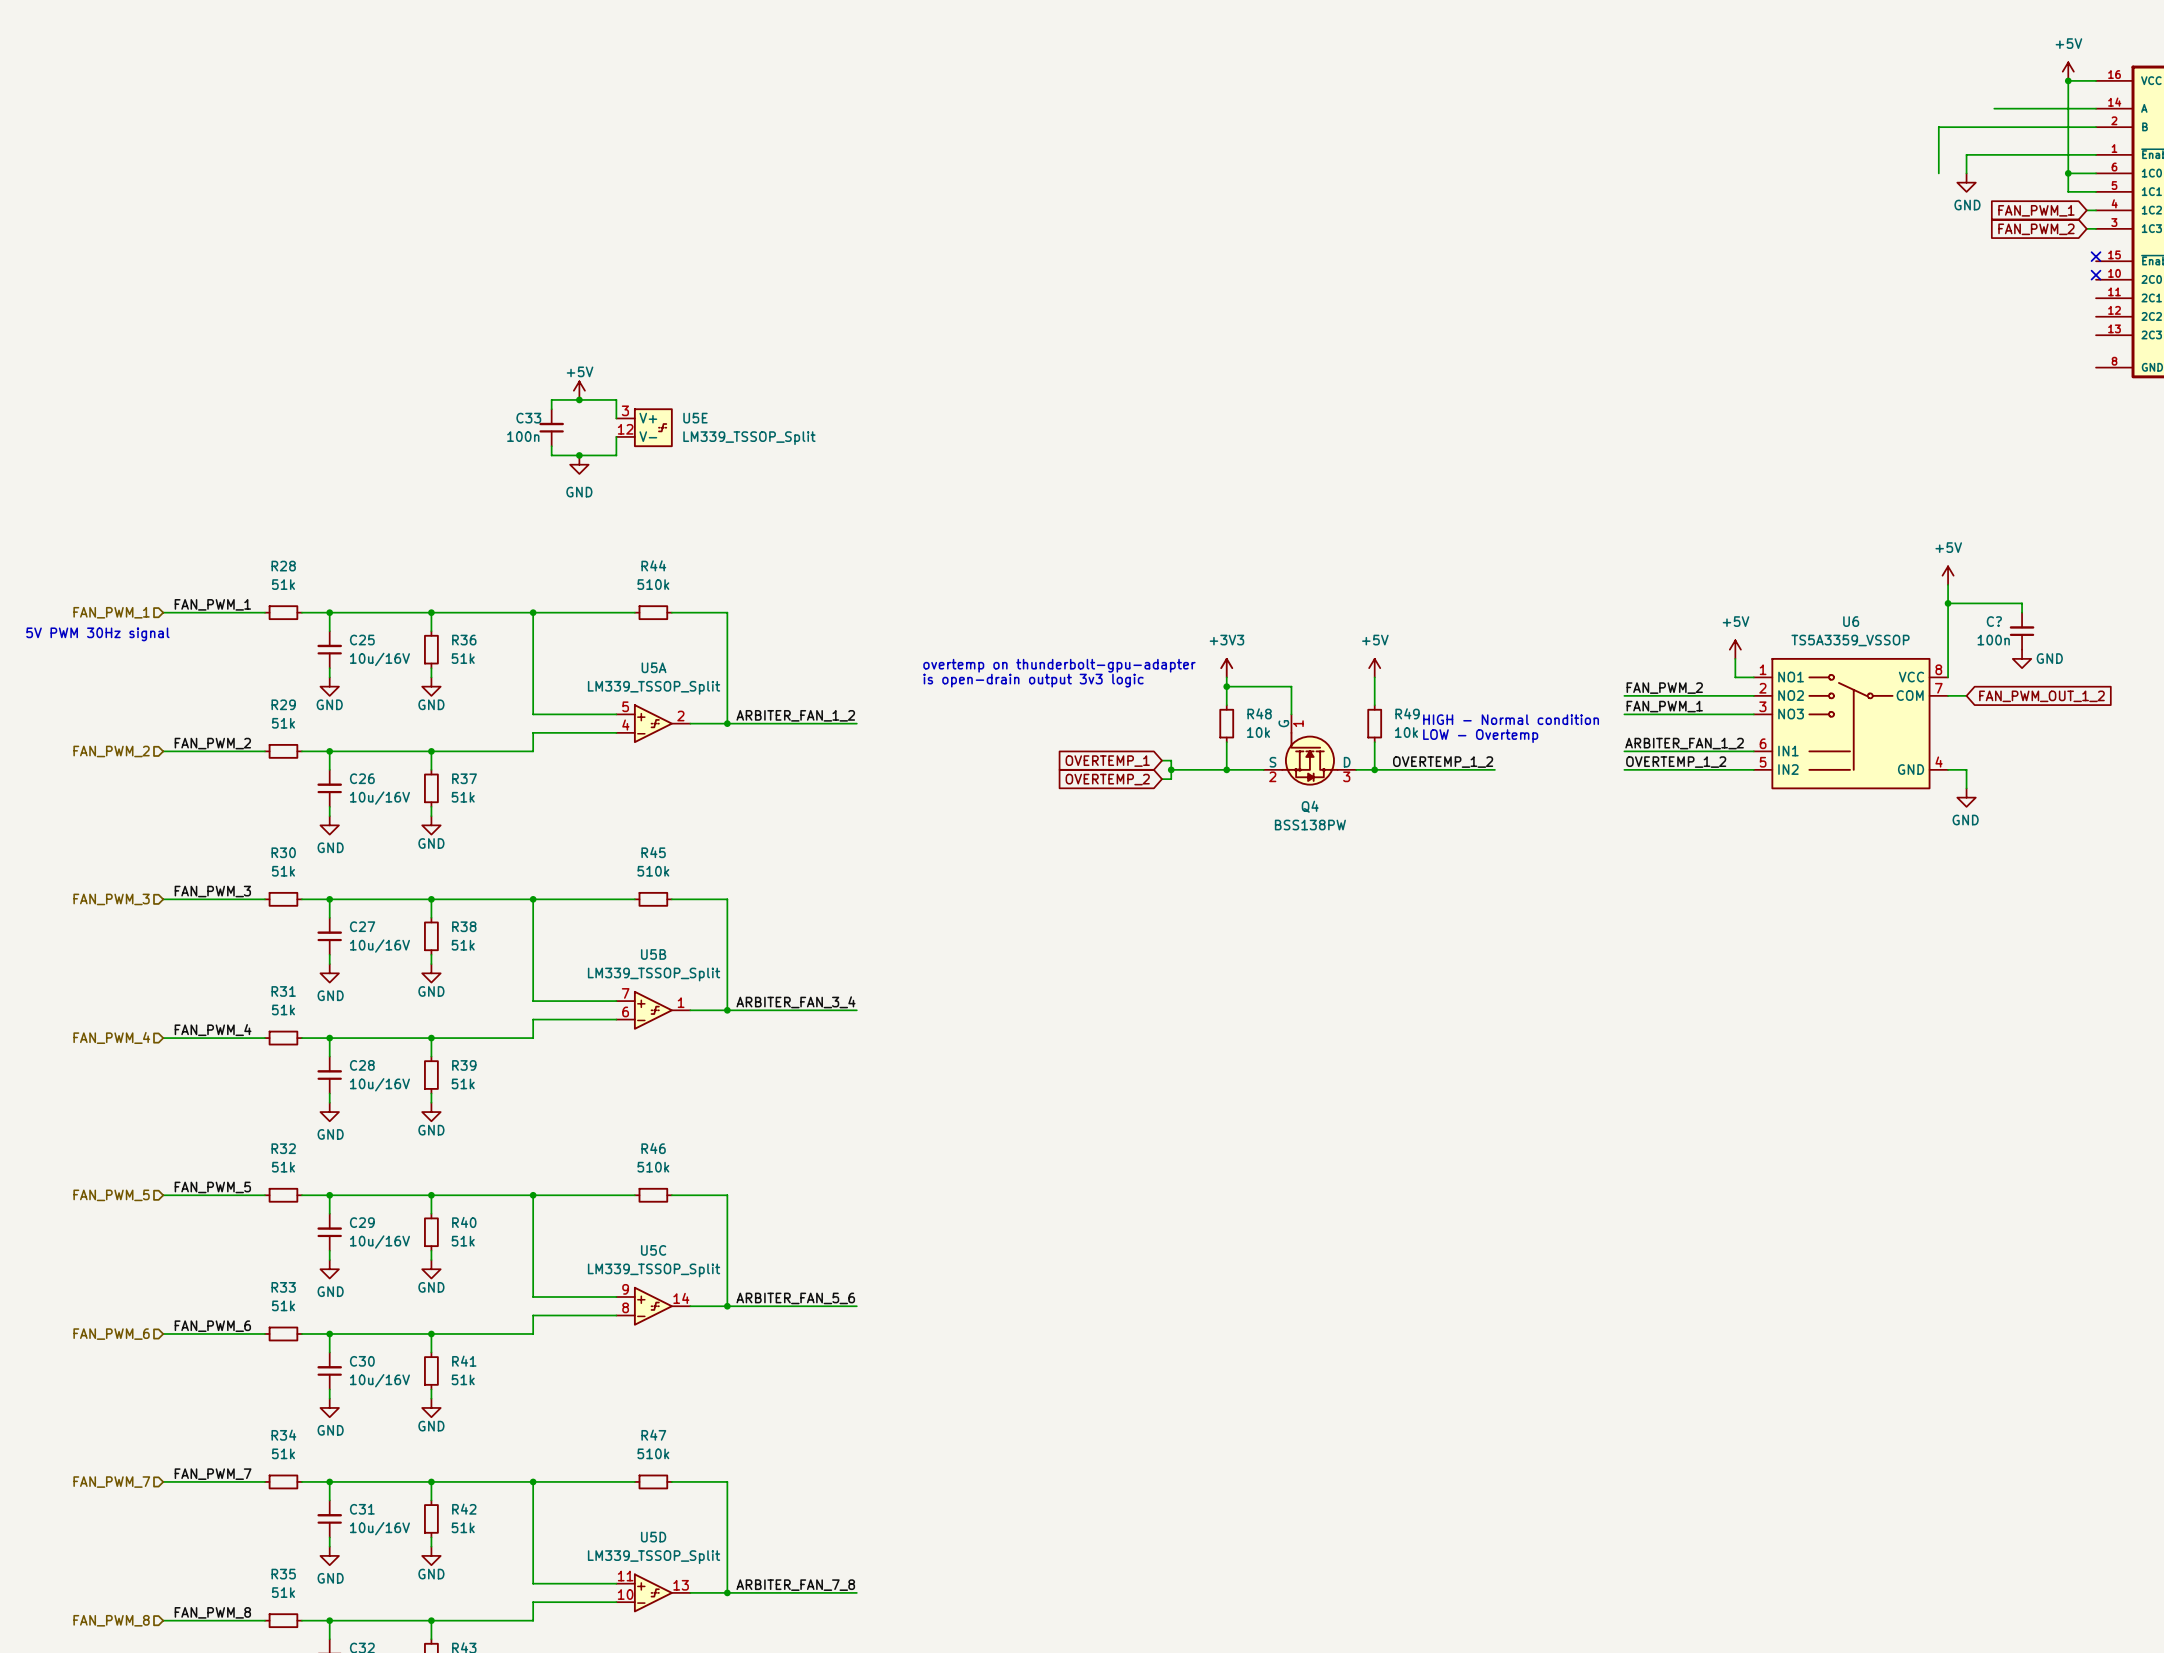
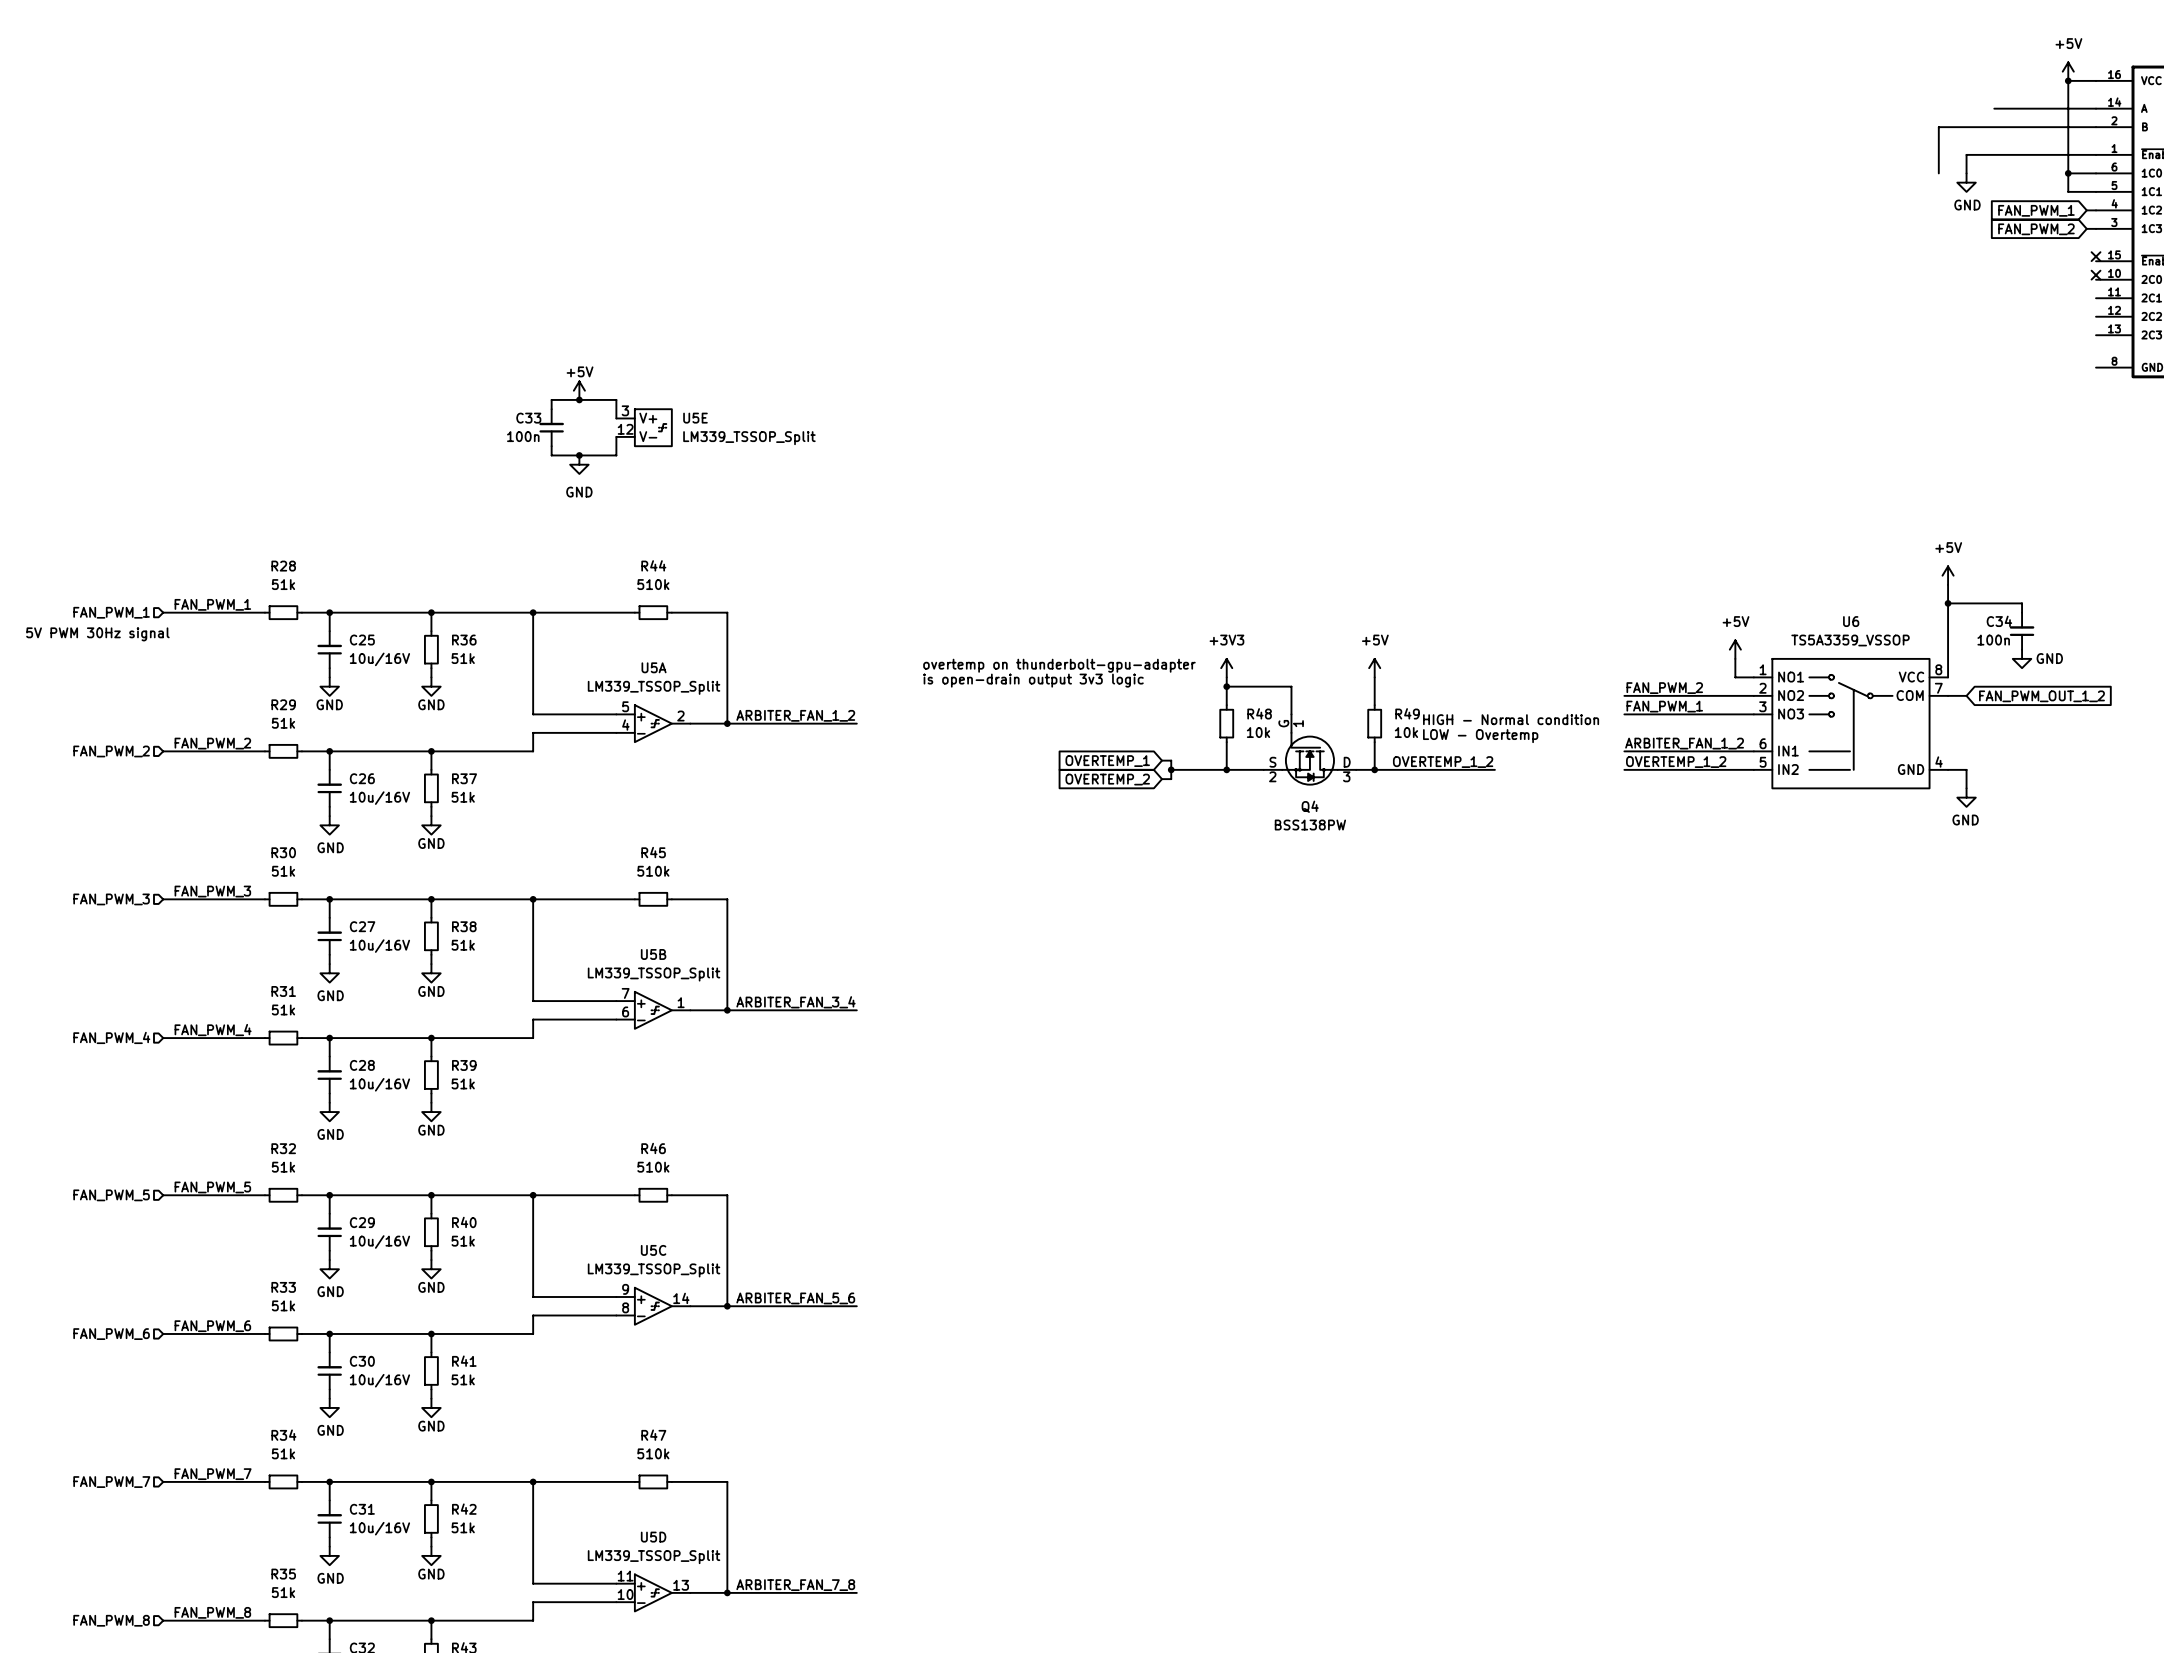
C? name: C? (1994, 621) -> C34 (1999, 621)

